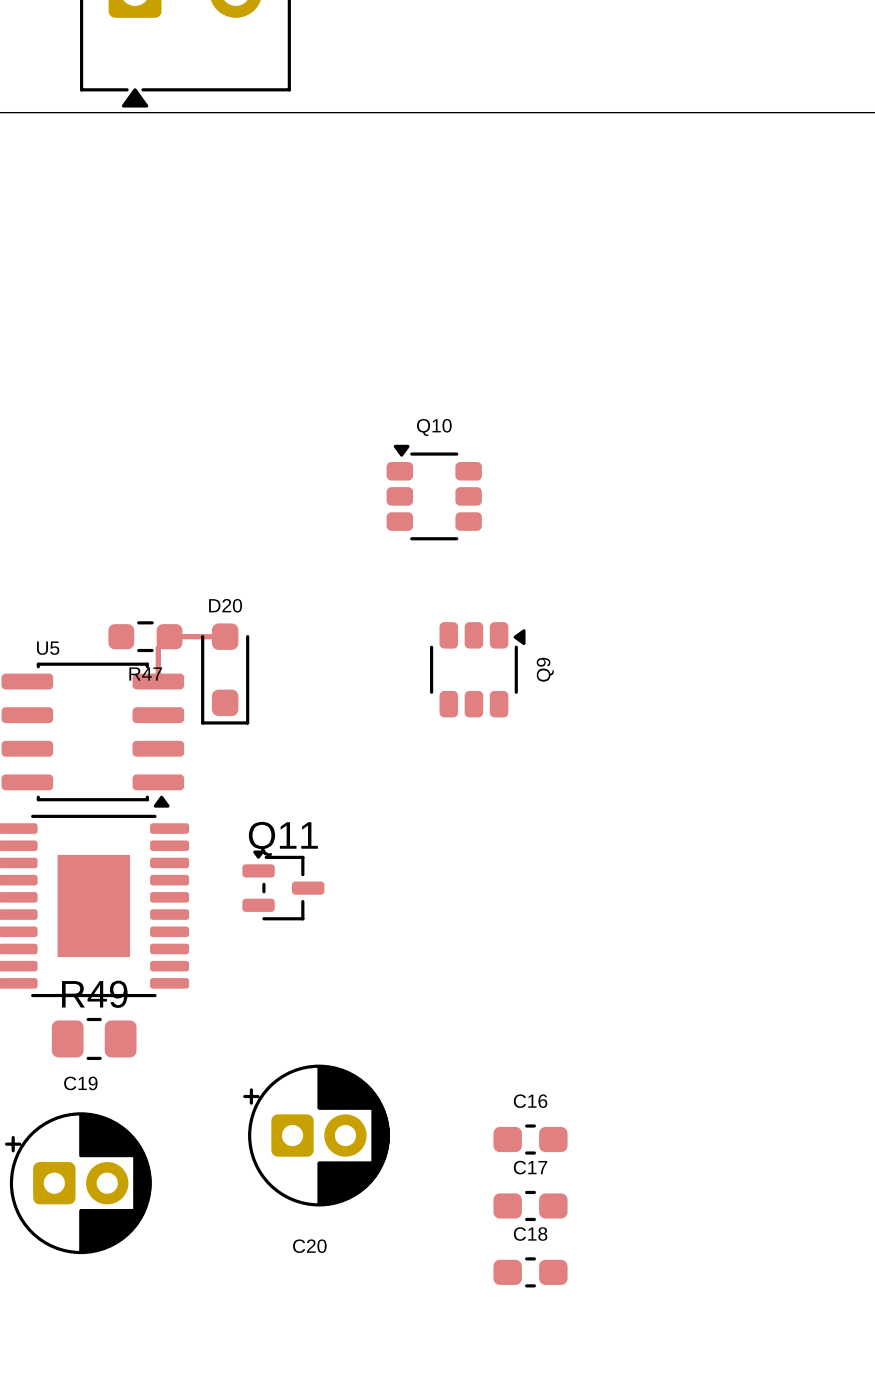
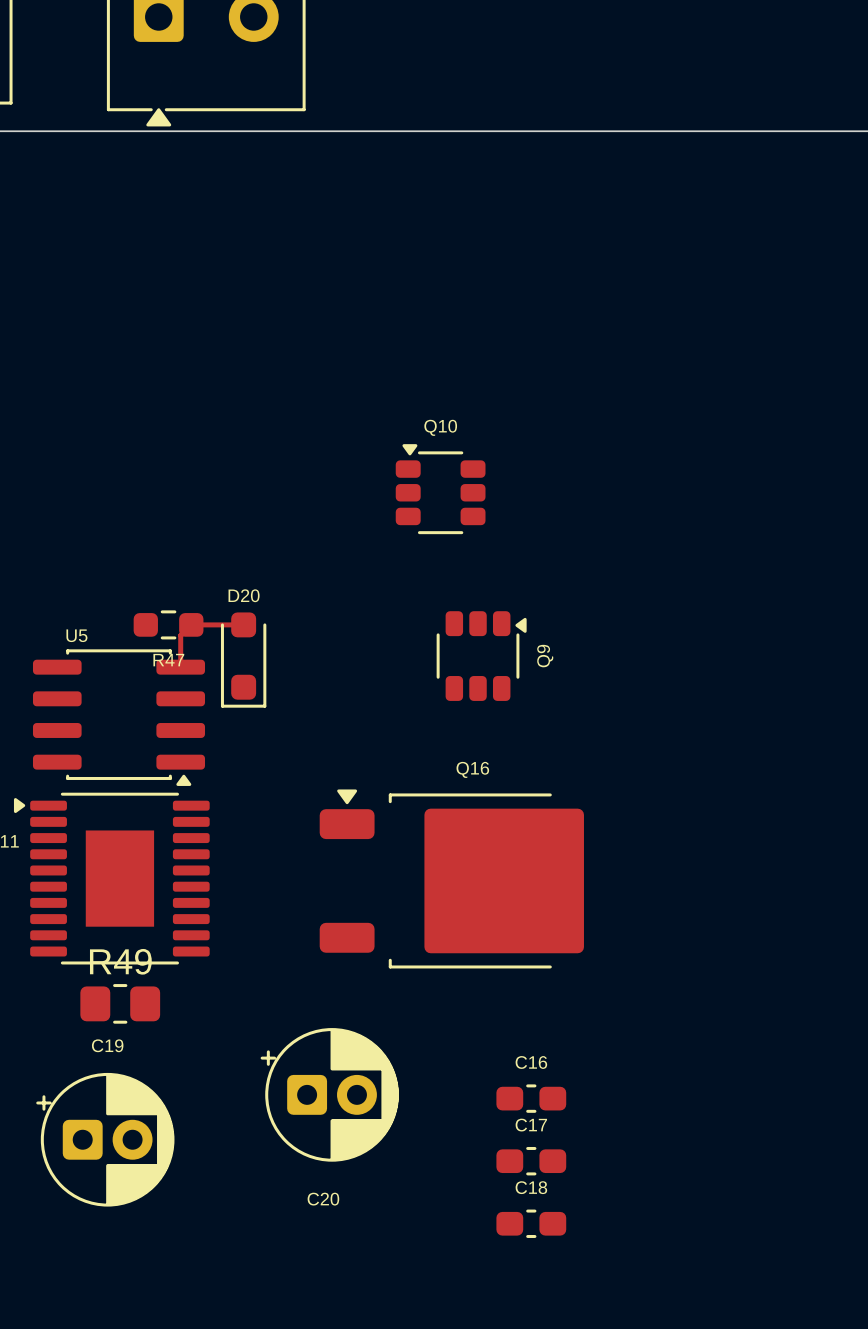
Q11: (283, 885) -> none
Q16: none -> (451, 878)

